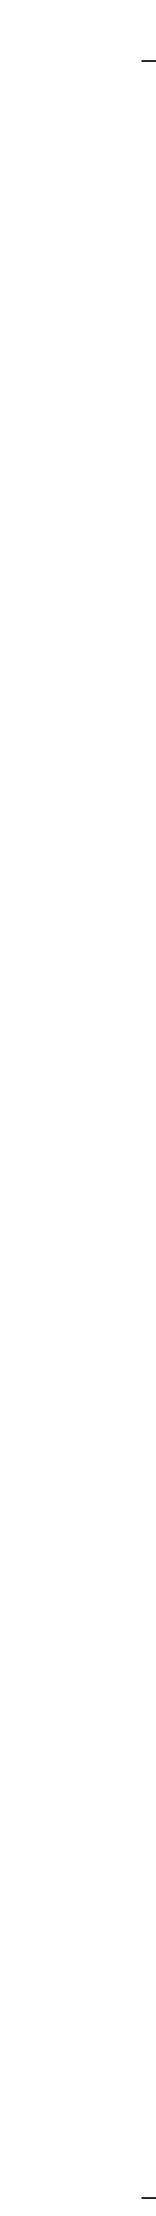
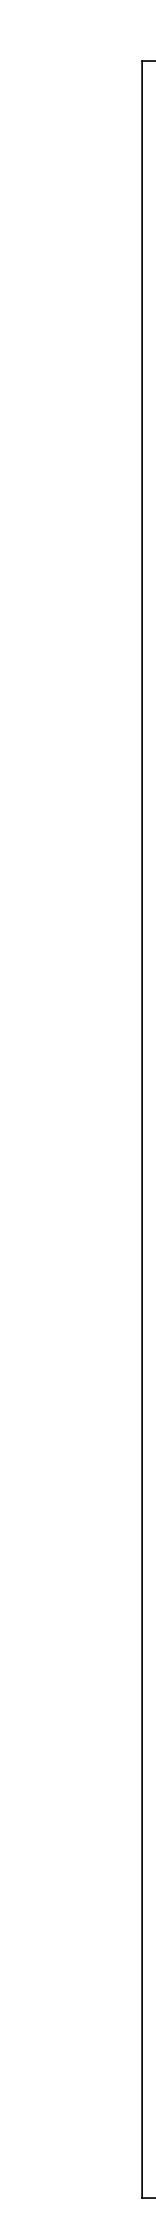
board edge: none -> (142, 61) (142, 2198)

